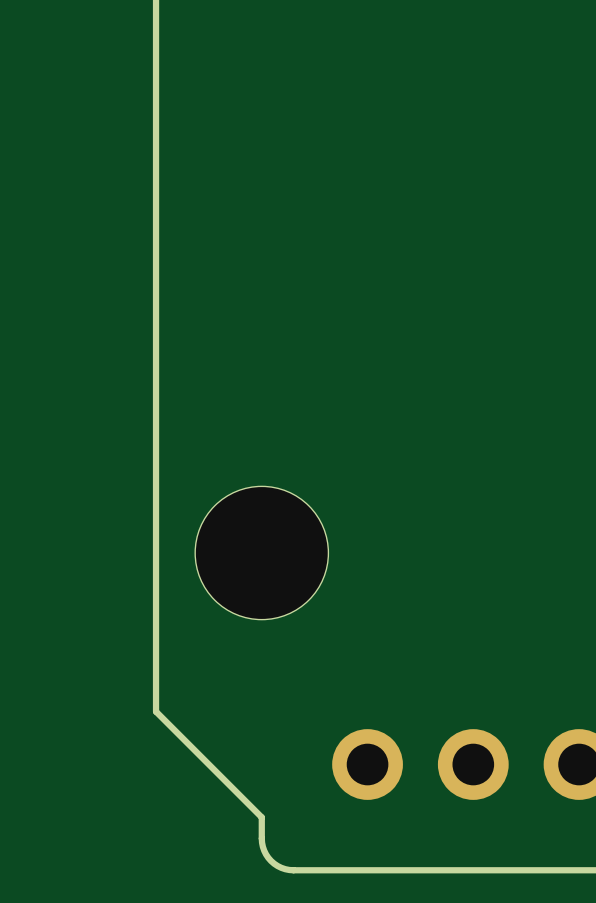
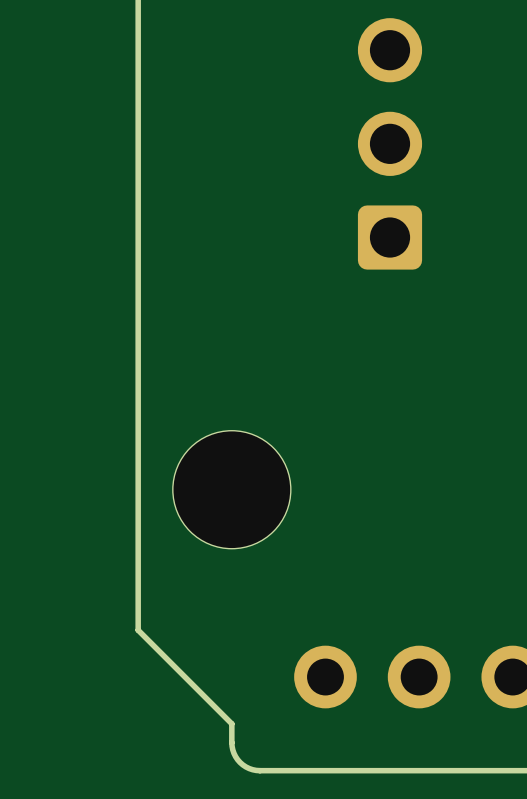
part: none -> (390, 143)

